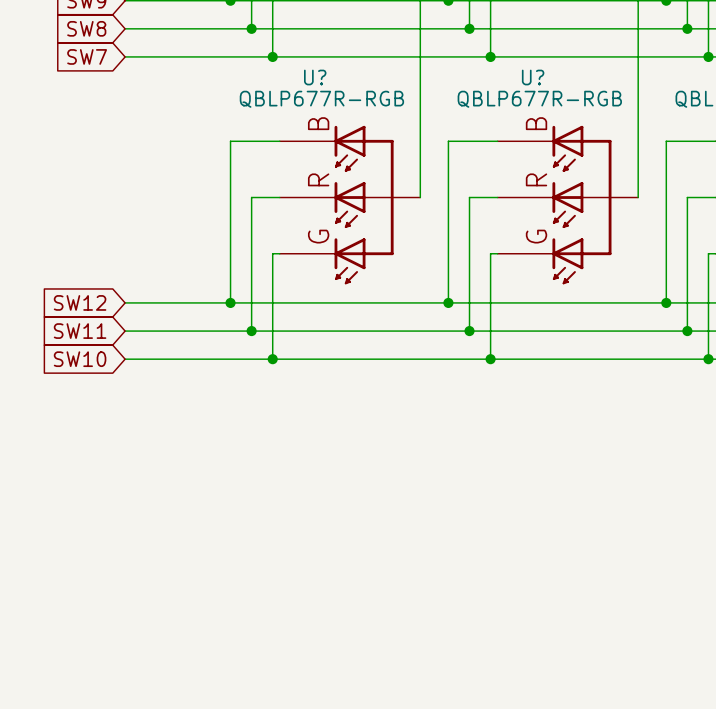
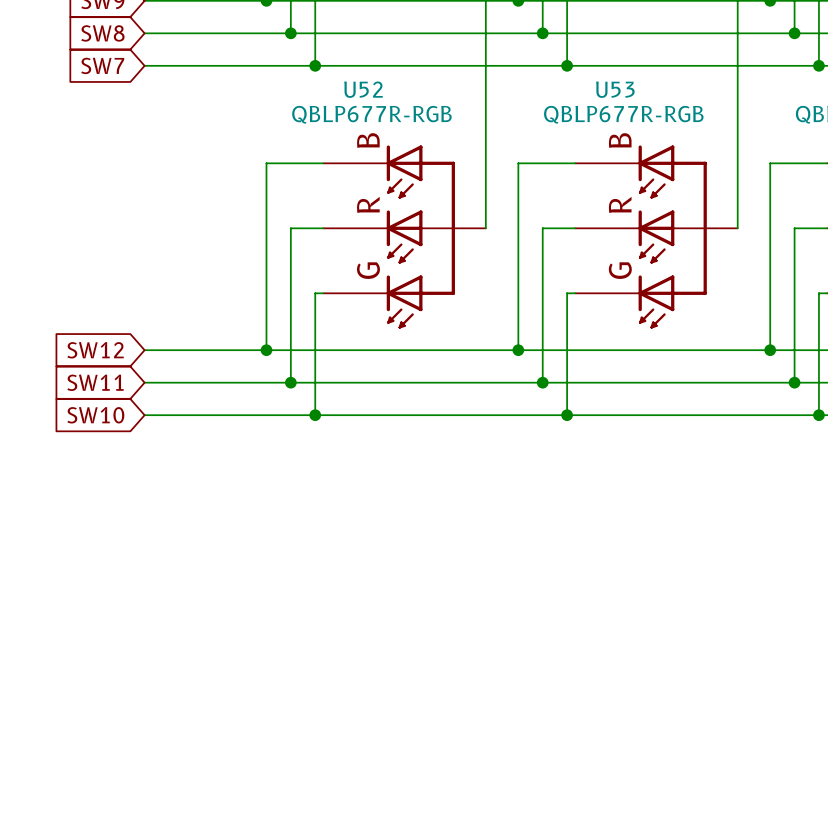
U? name: U? (315, 77) -> U52 (363, 89)
U? name: U? (533, 77) -> U53 (615, 89)

